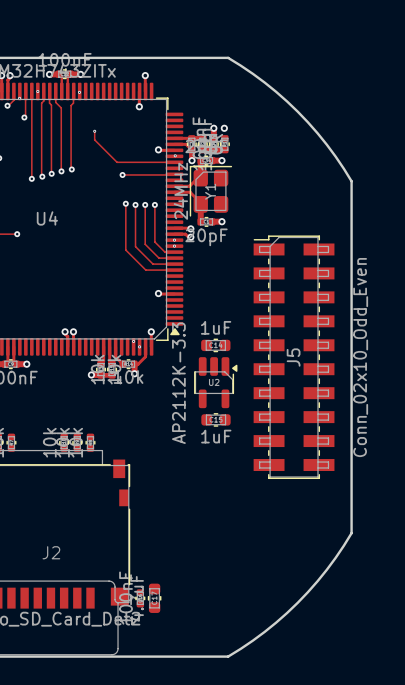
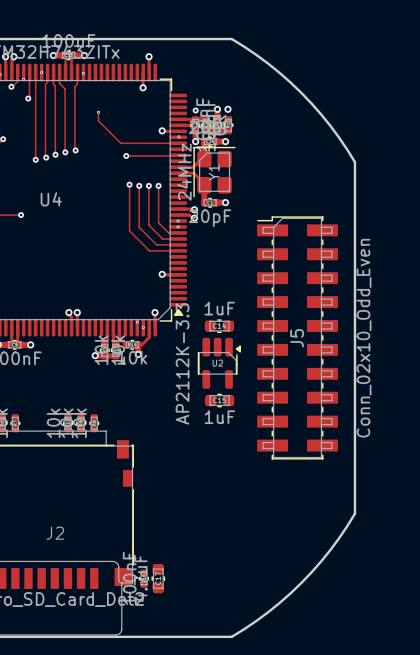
via: none -> (195, 110)

